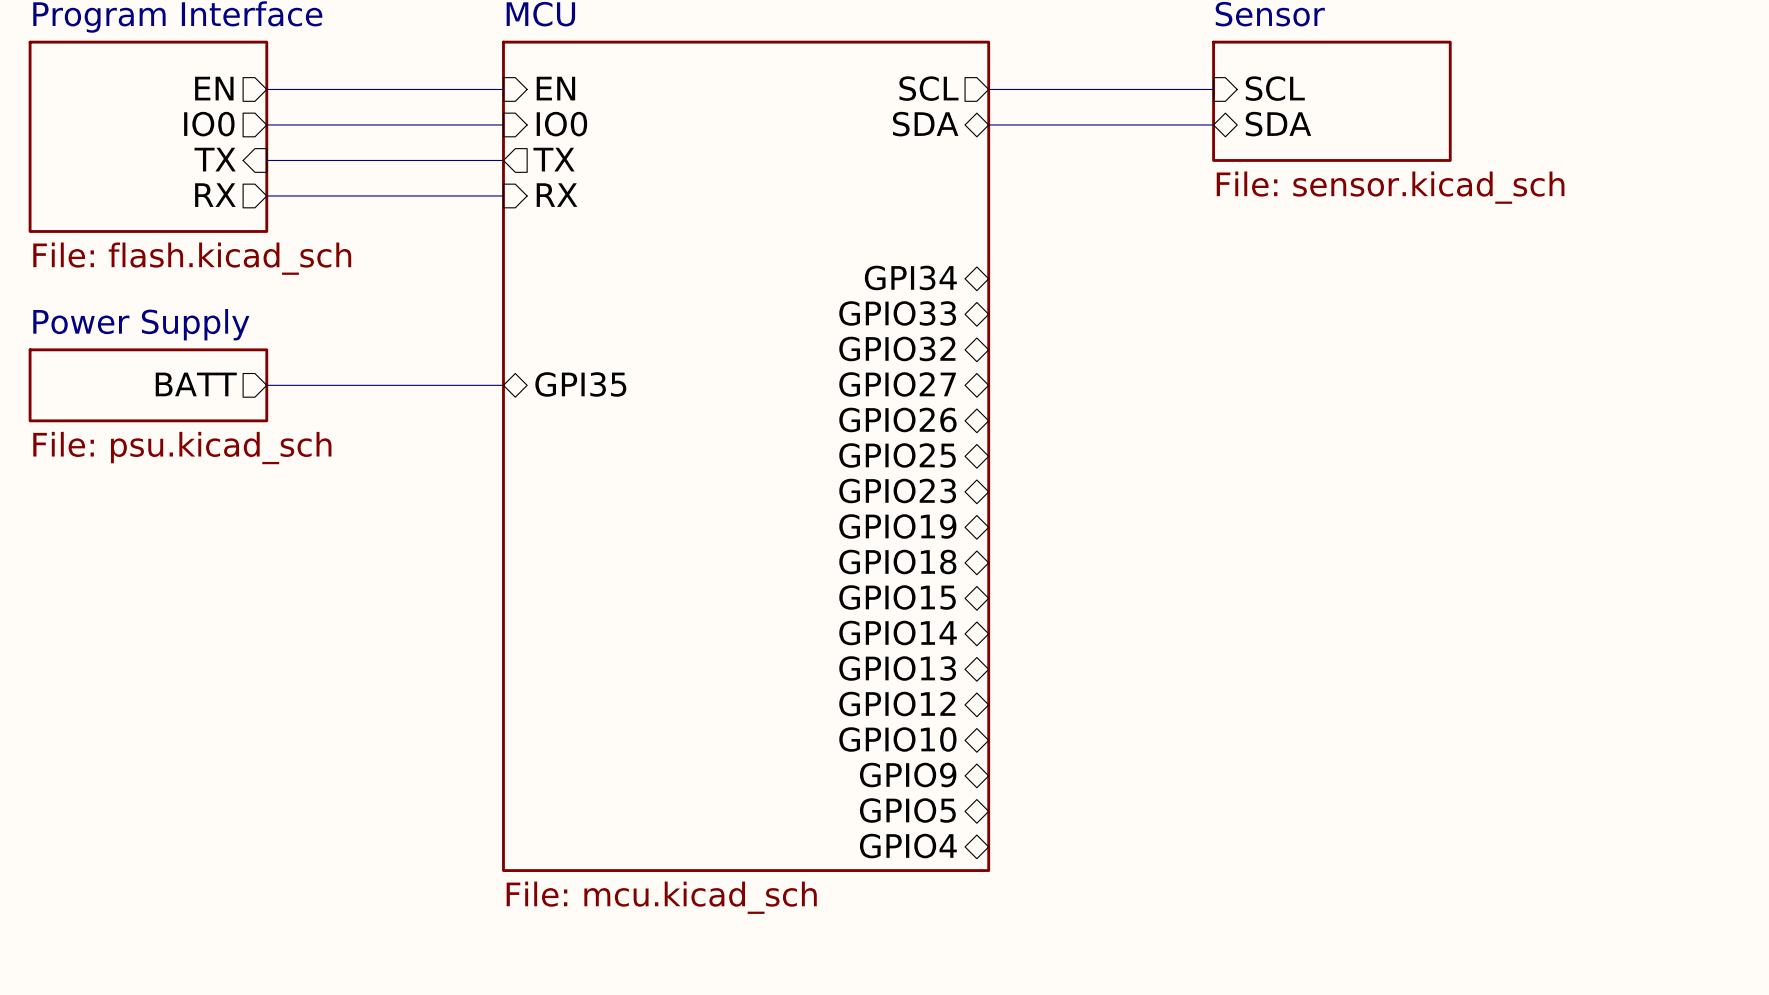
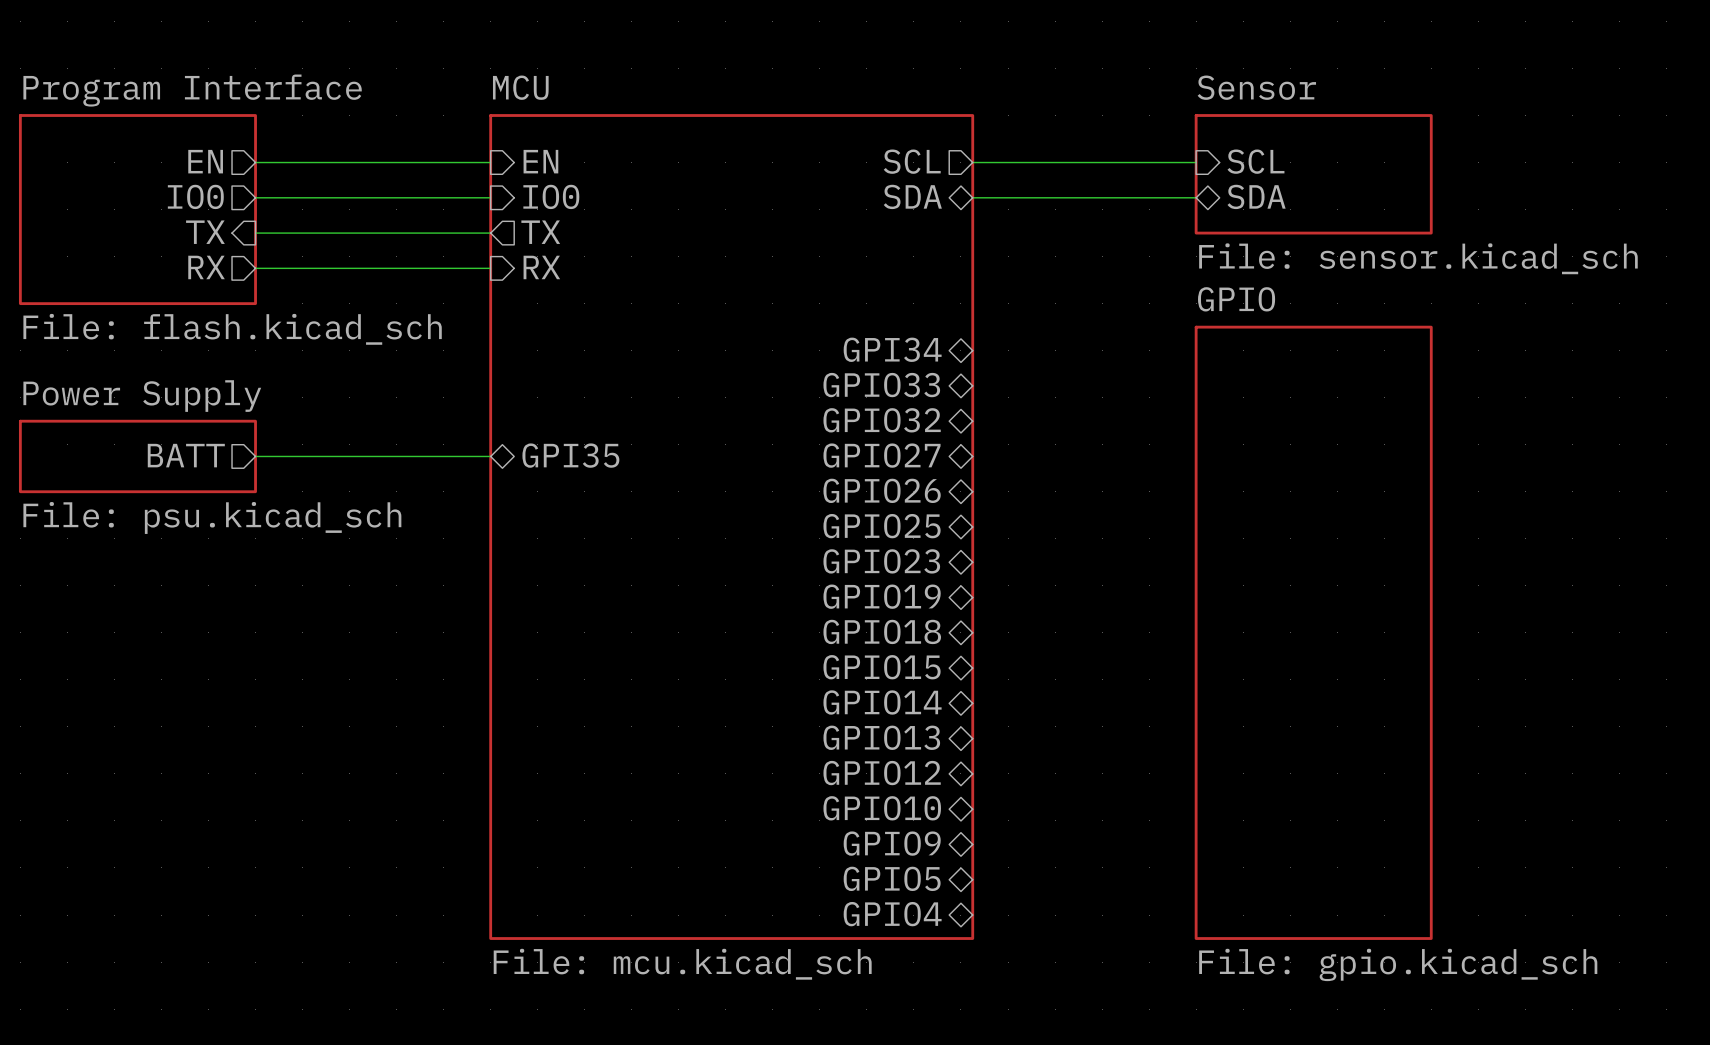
sheet GPIO: none -> File: gpio.kicad_sch (1313, 632)

